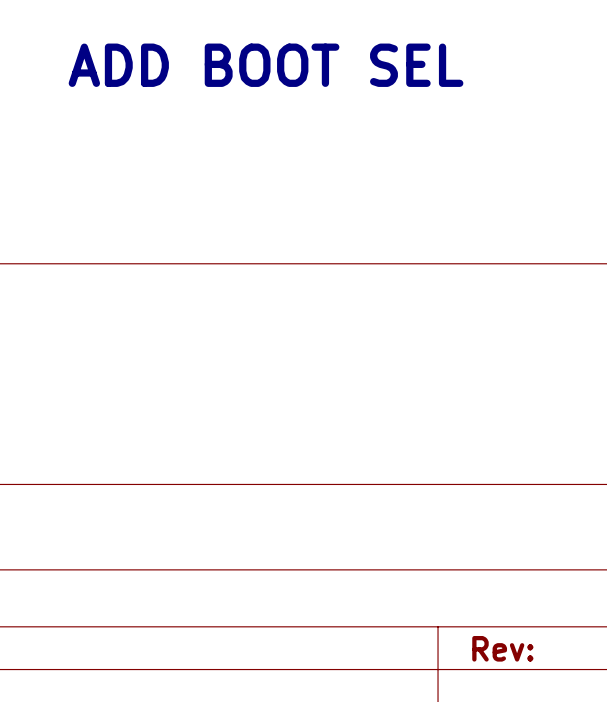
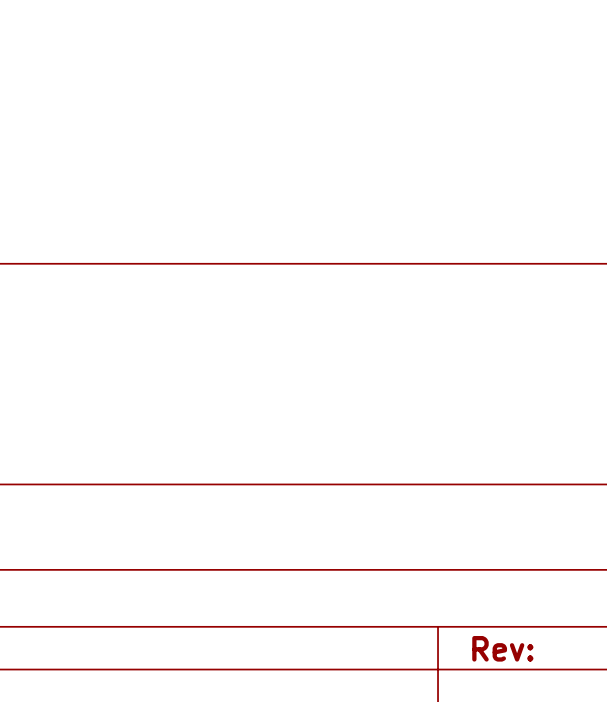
text: ADD BOOT SEL (266, 65) -> none

